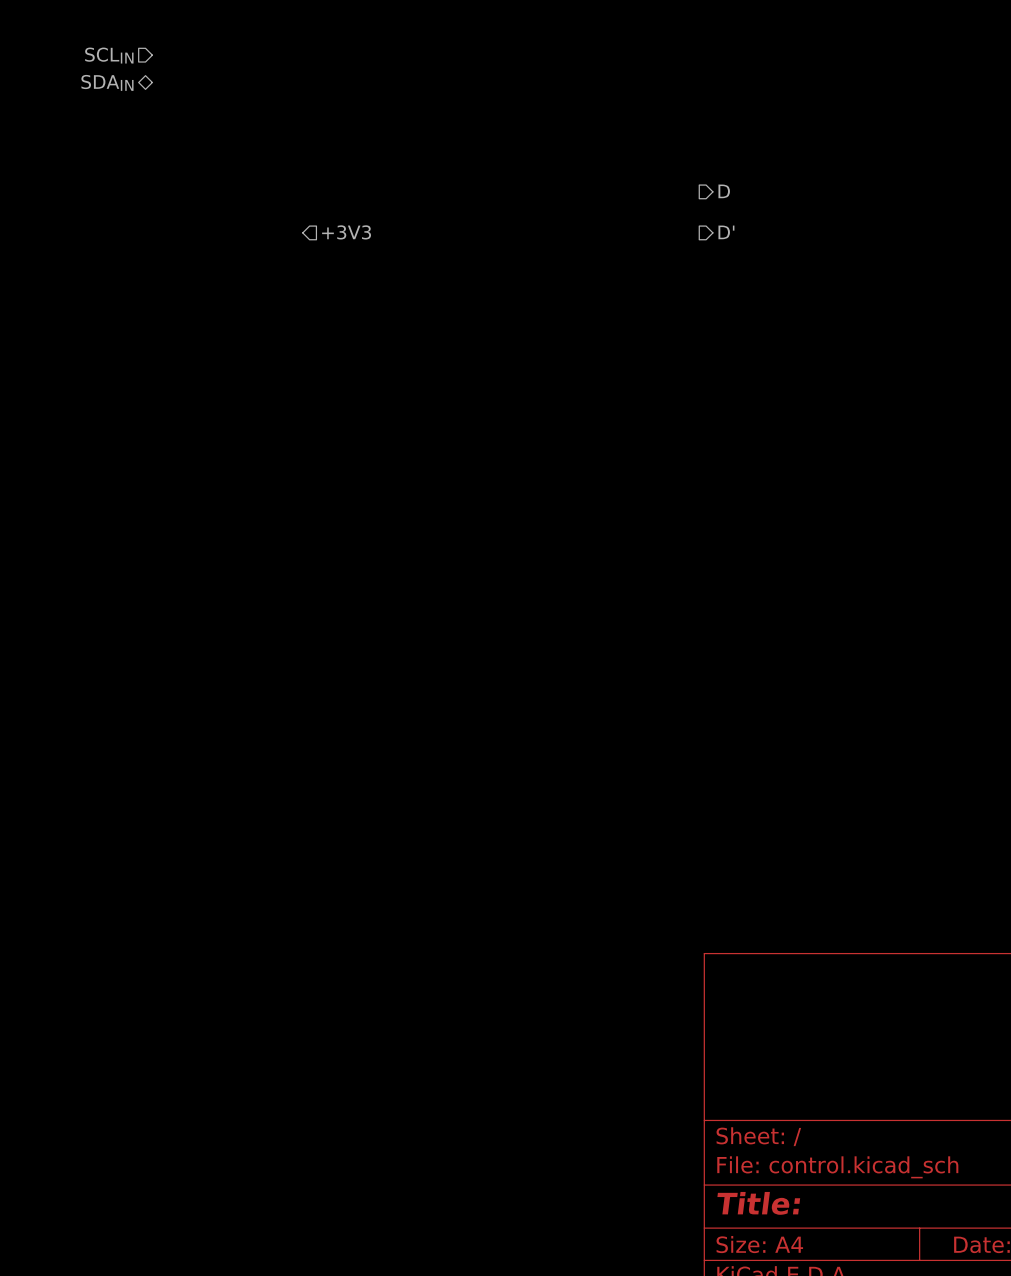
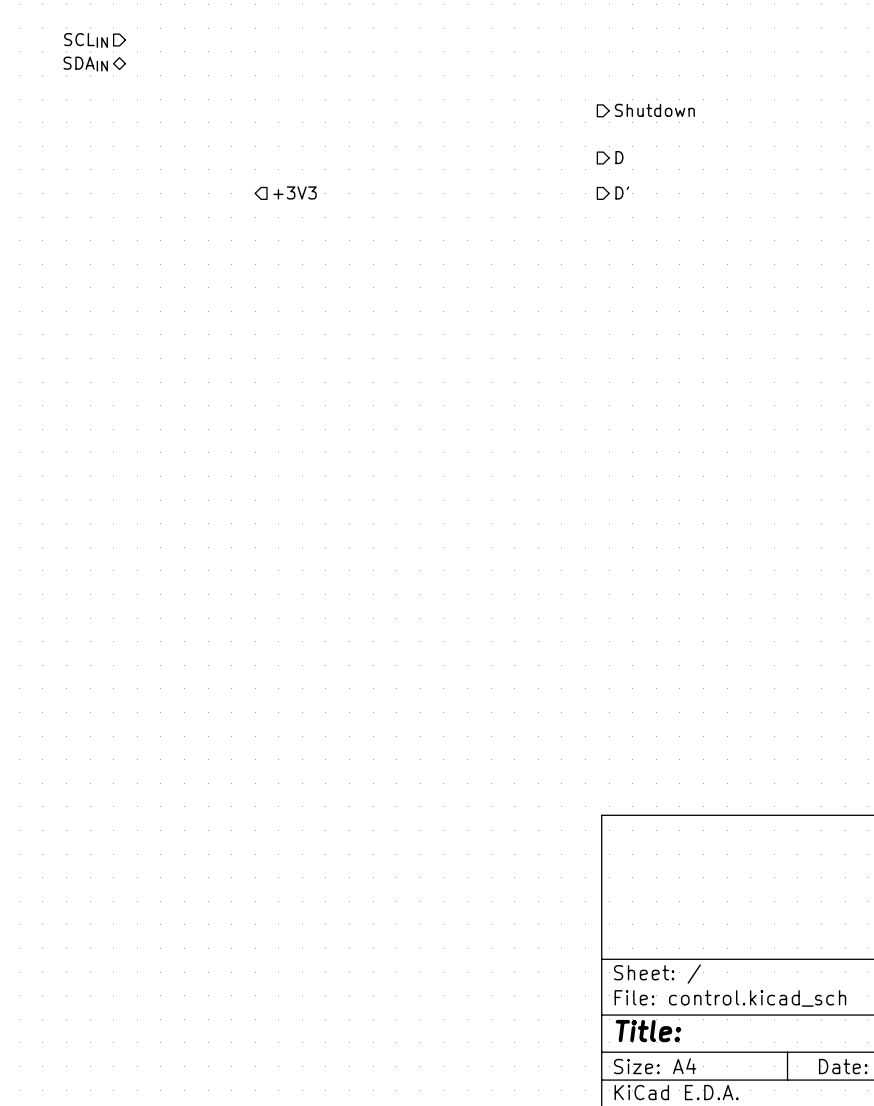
hierarchical label: none -> Shutdown (654, 110)

